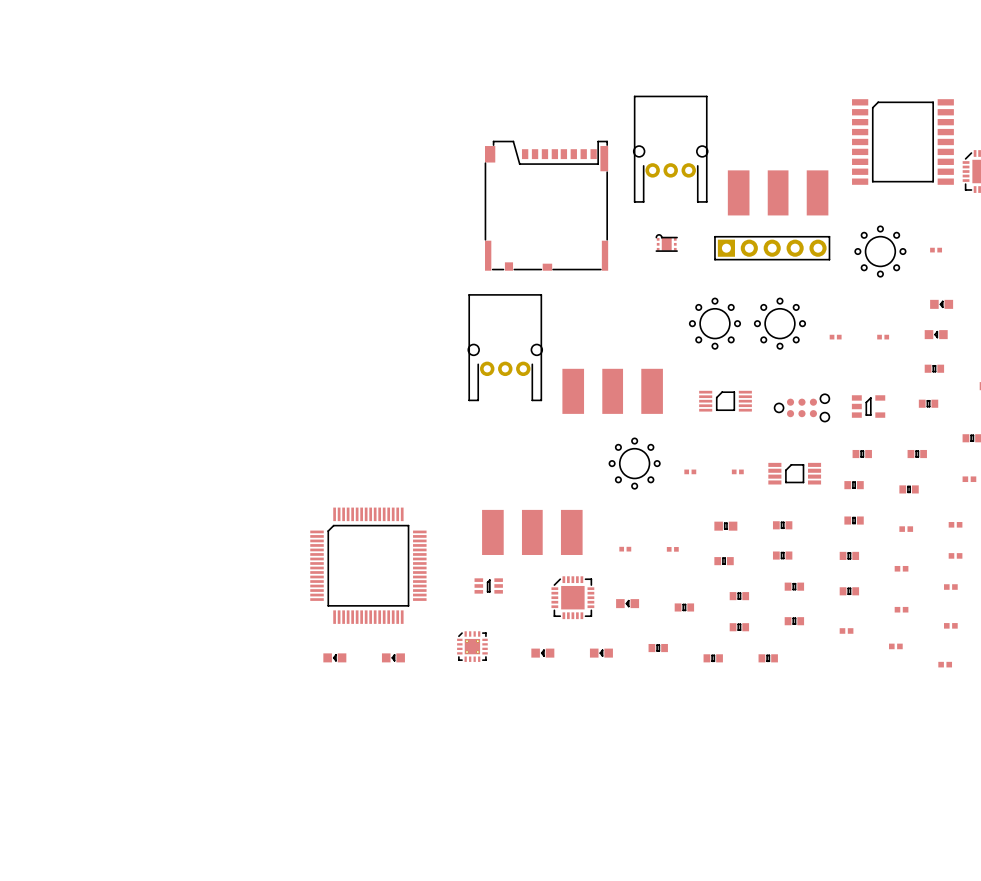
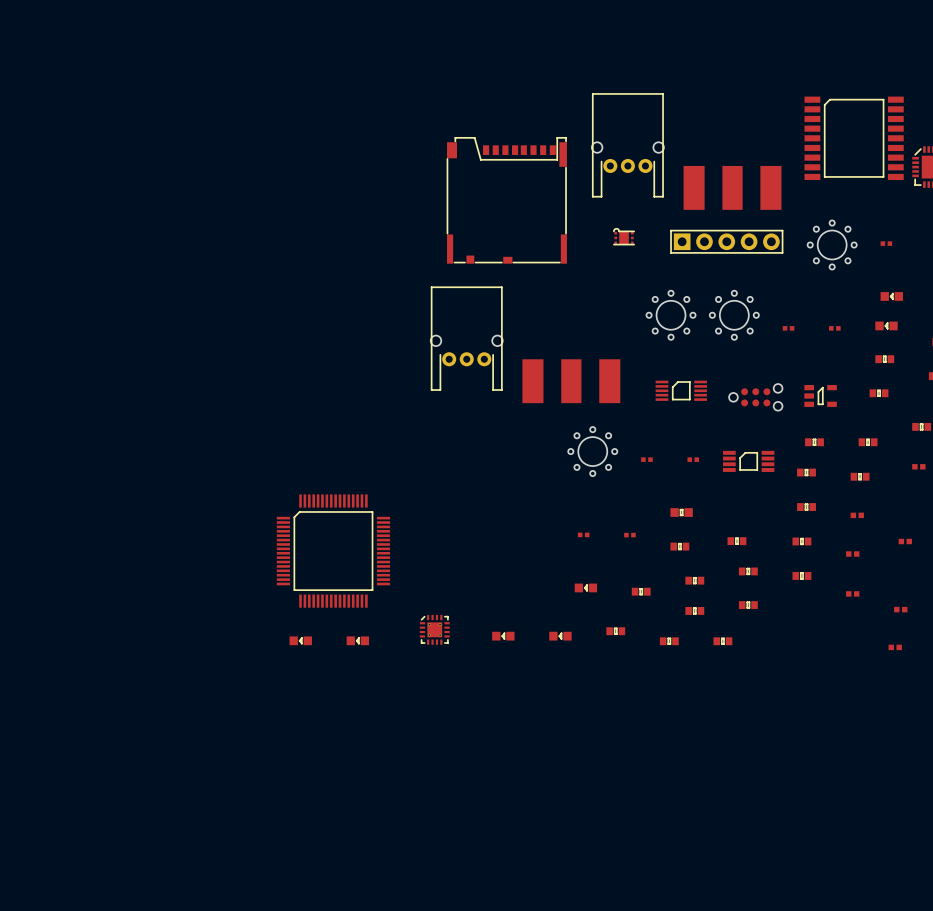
part: (955, 524) -> none
part: (782, 525) -> none
part: (532, 532) -> none
part: (488, 585) -> none
part: (950, 587) -> none
part: (572, 597) -> none
part: (846, 630) -> none
part: (895, 646) -> none

